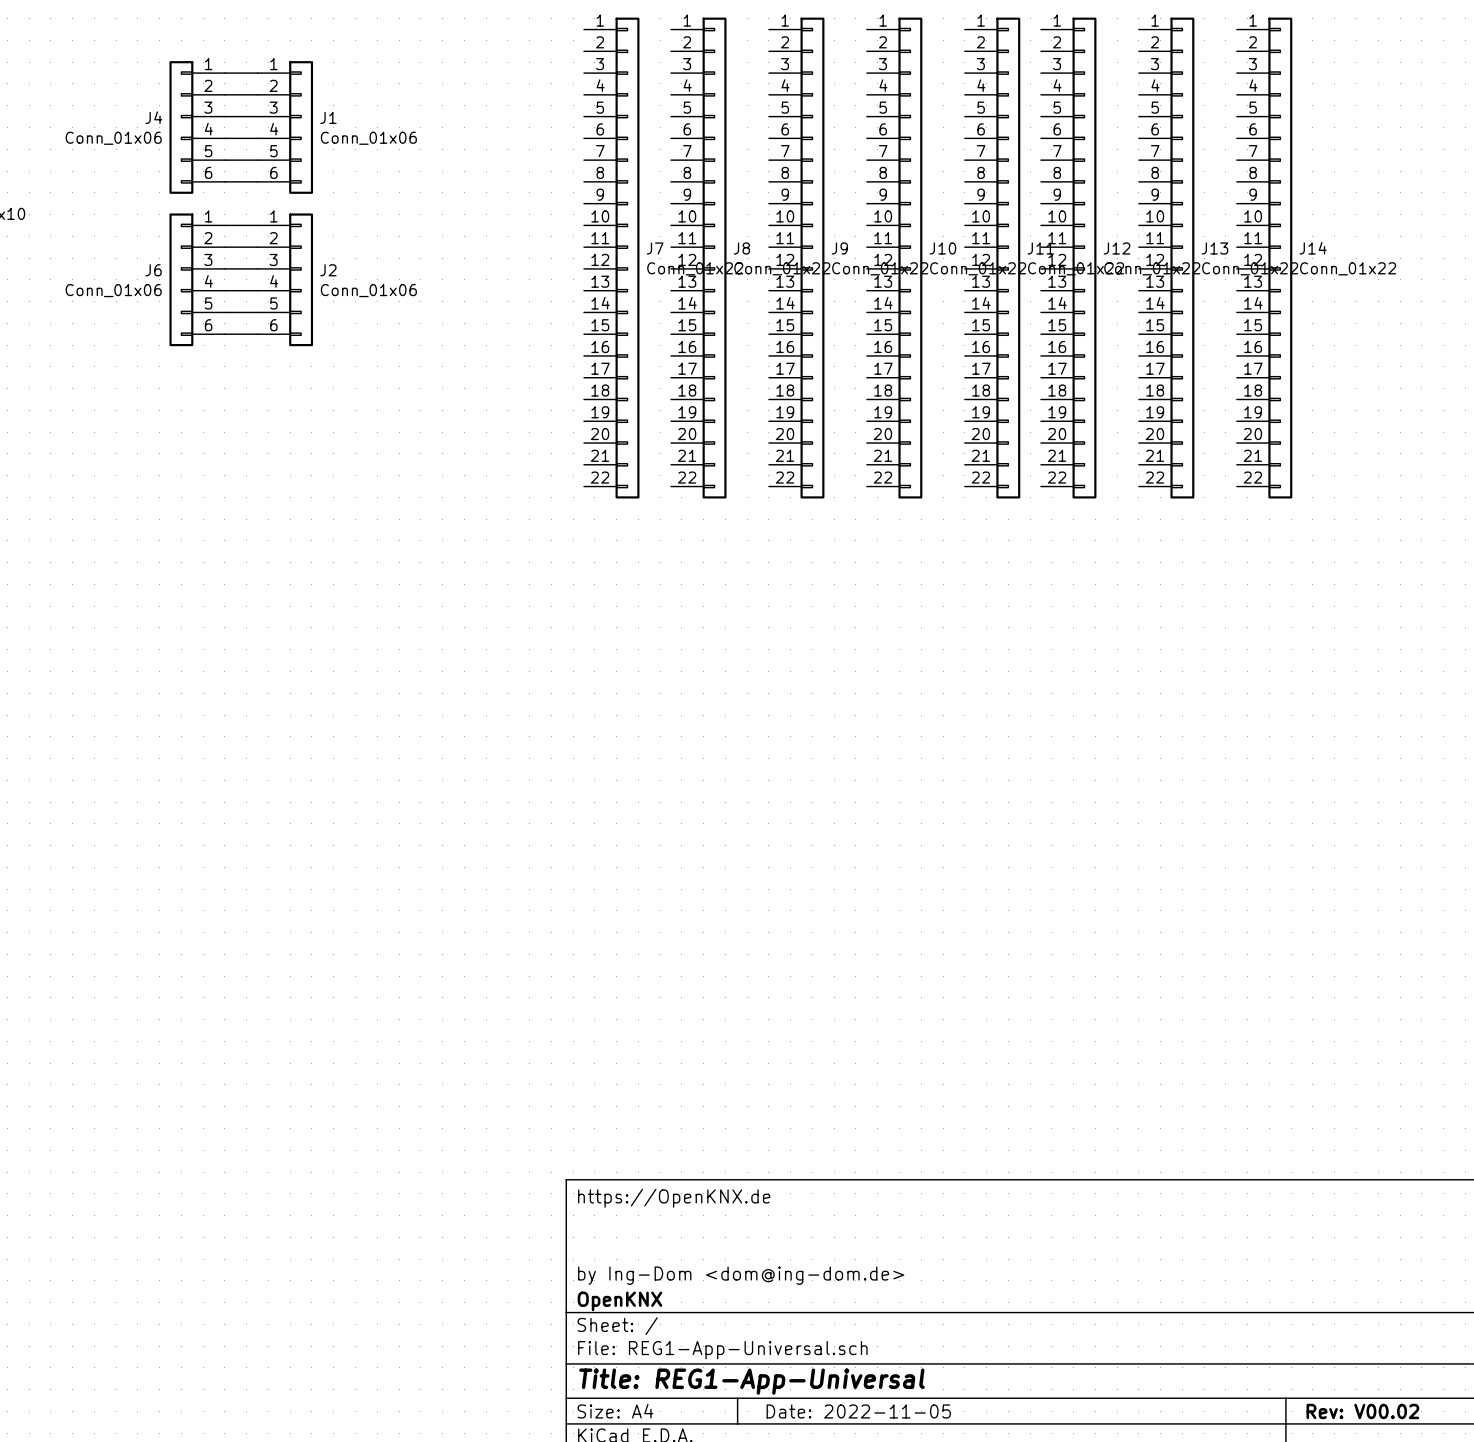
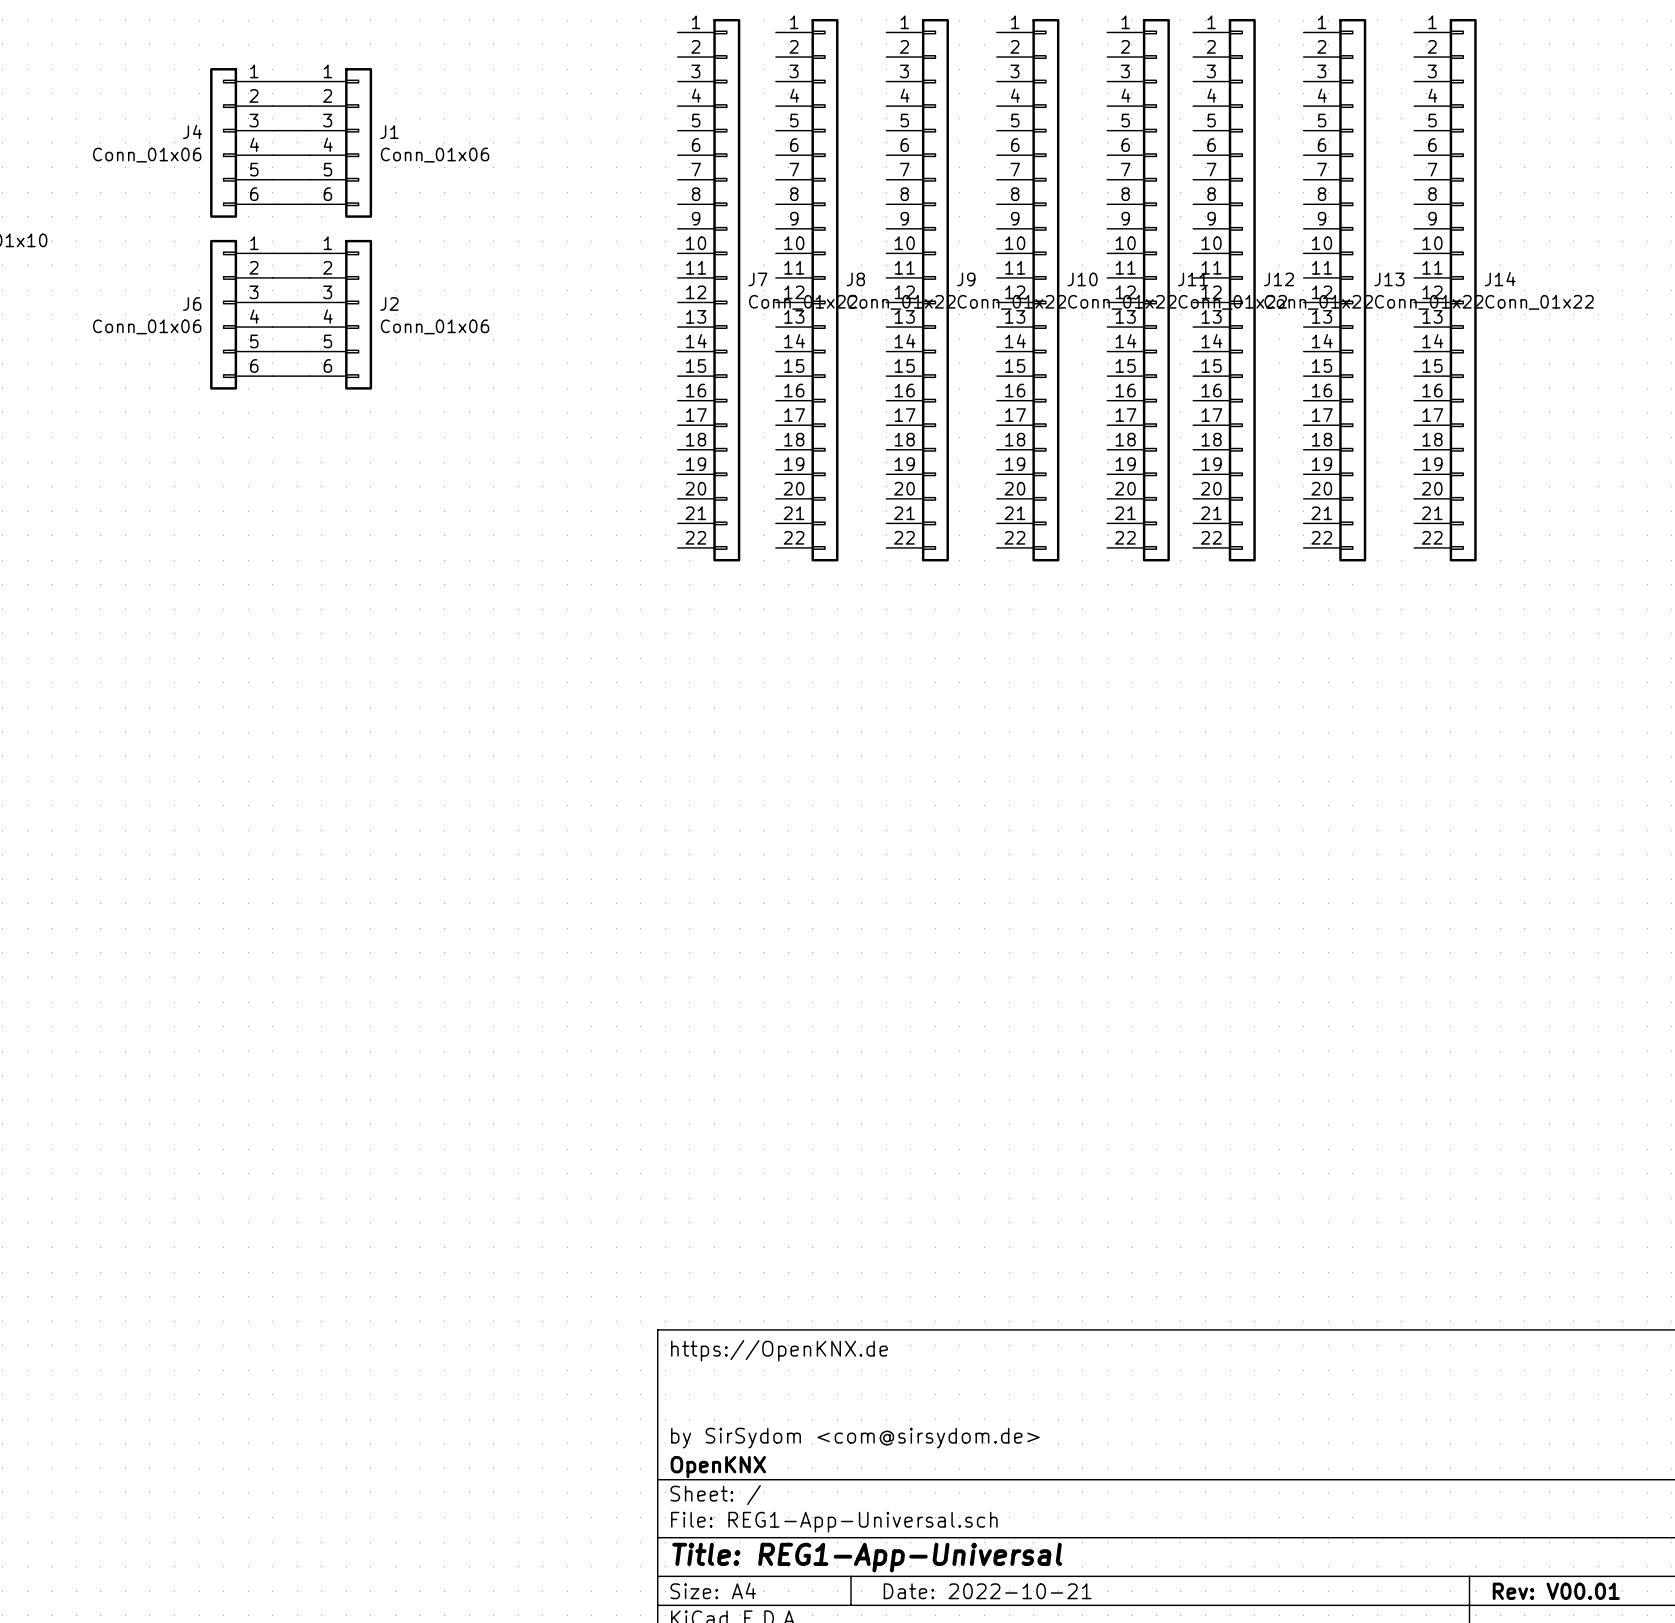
title block: by Ing-Dom <dom@ing-dom.de> (741, 1275) -> by SirSydom <com@sirsydom.de> (855, 1438)
title block: Date: 2022-11-05 (858, 1411) -> Date: 2022-10-21 (987, 1591)
title block: Rev: V00.02 (1362, 1411) -> Rev: V00.01 (1556, 1591)

